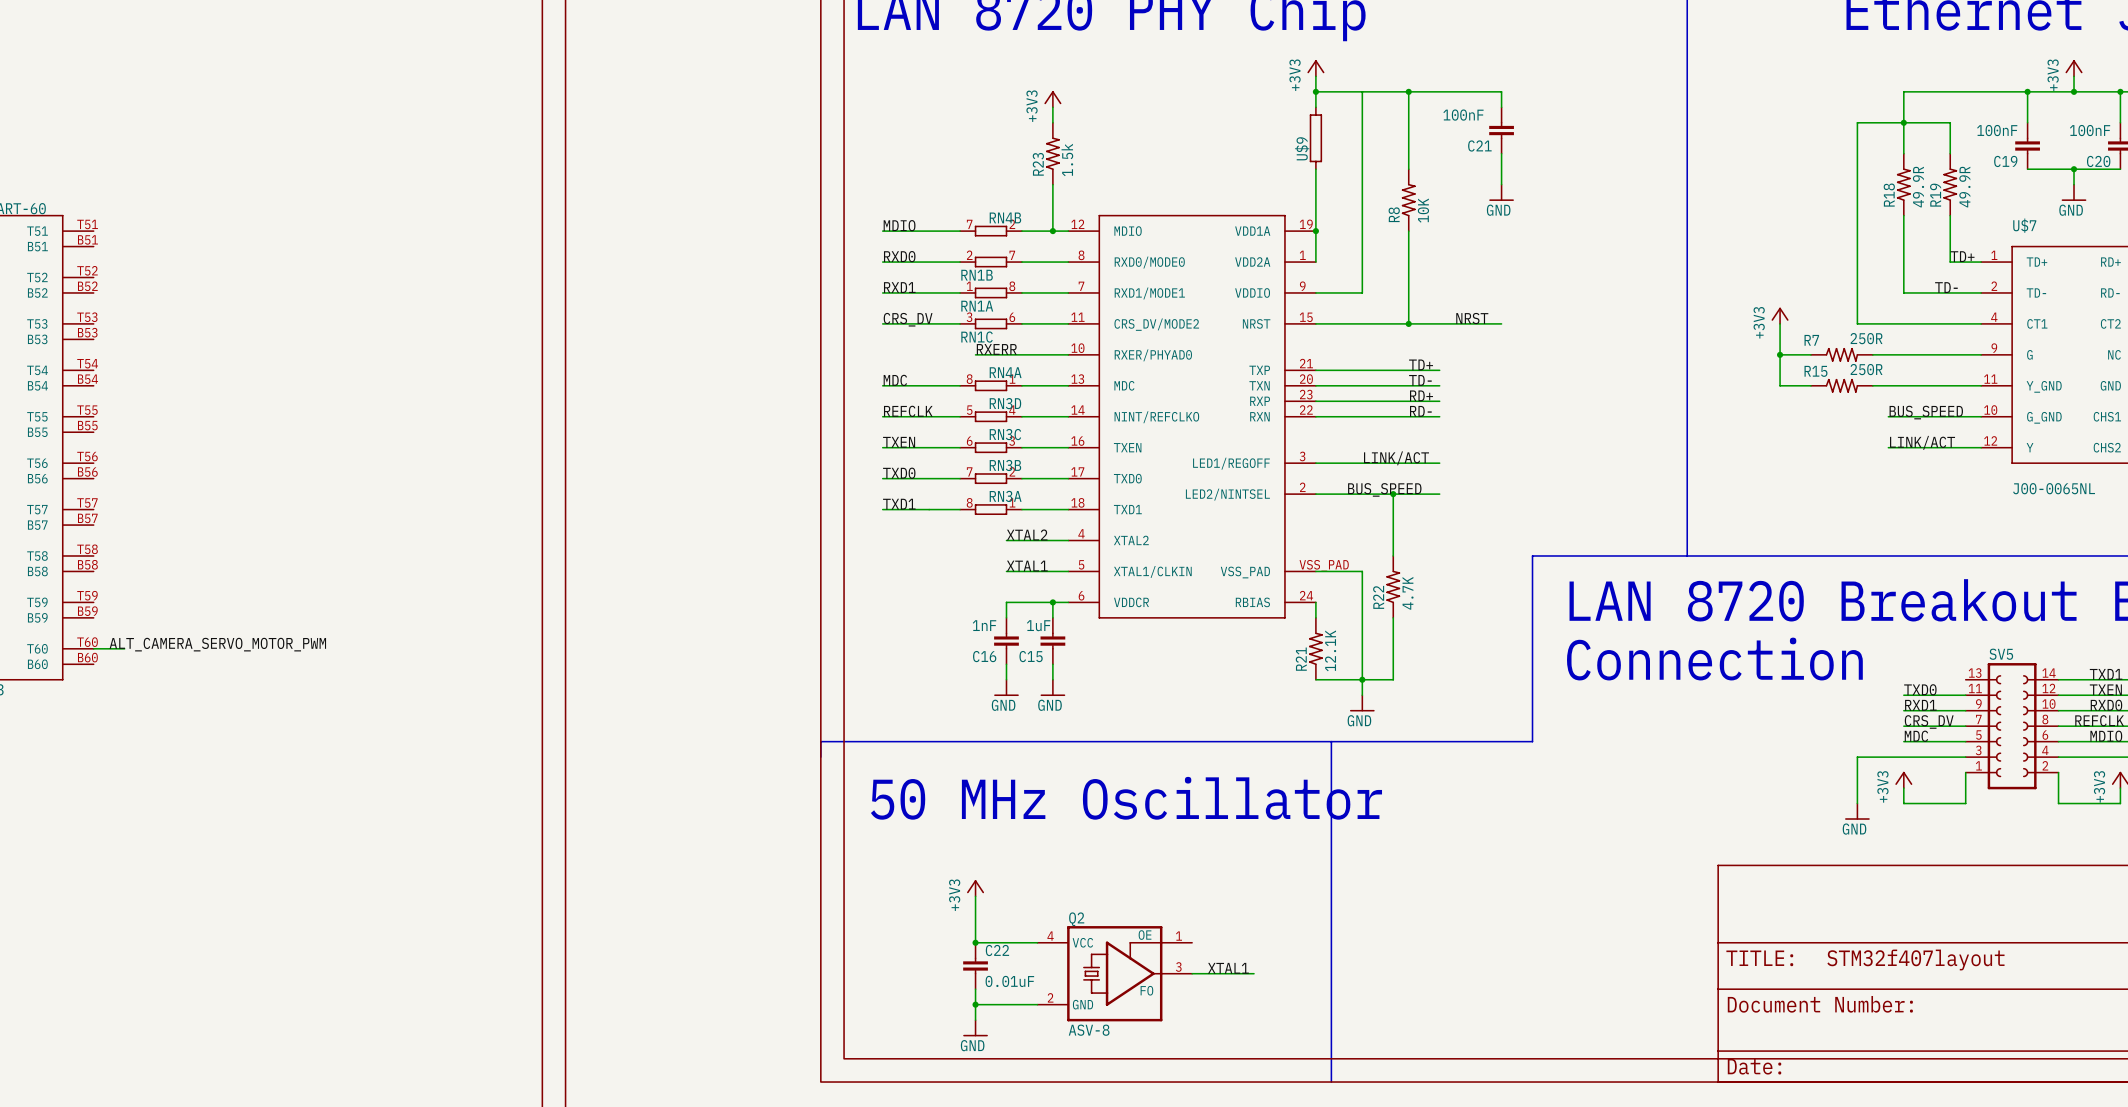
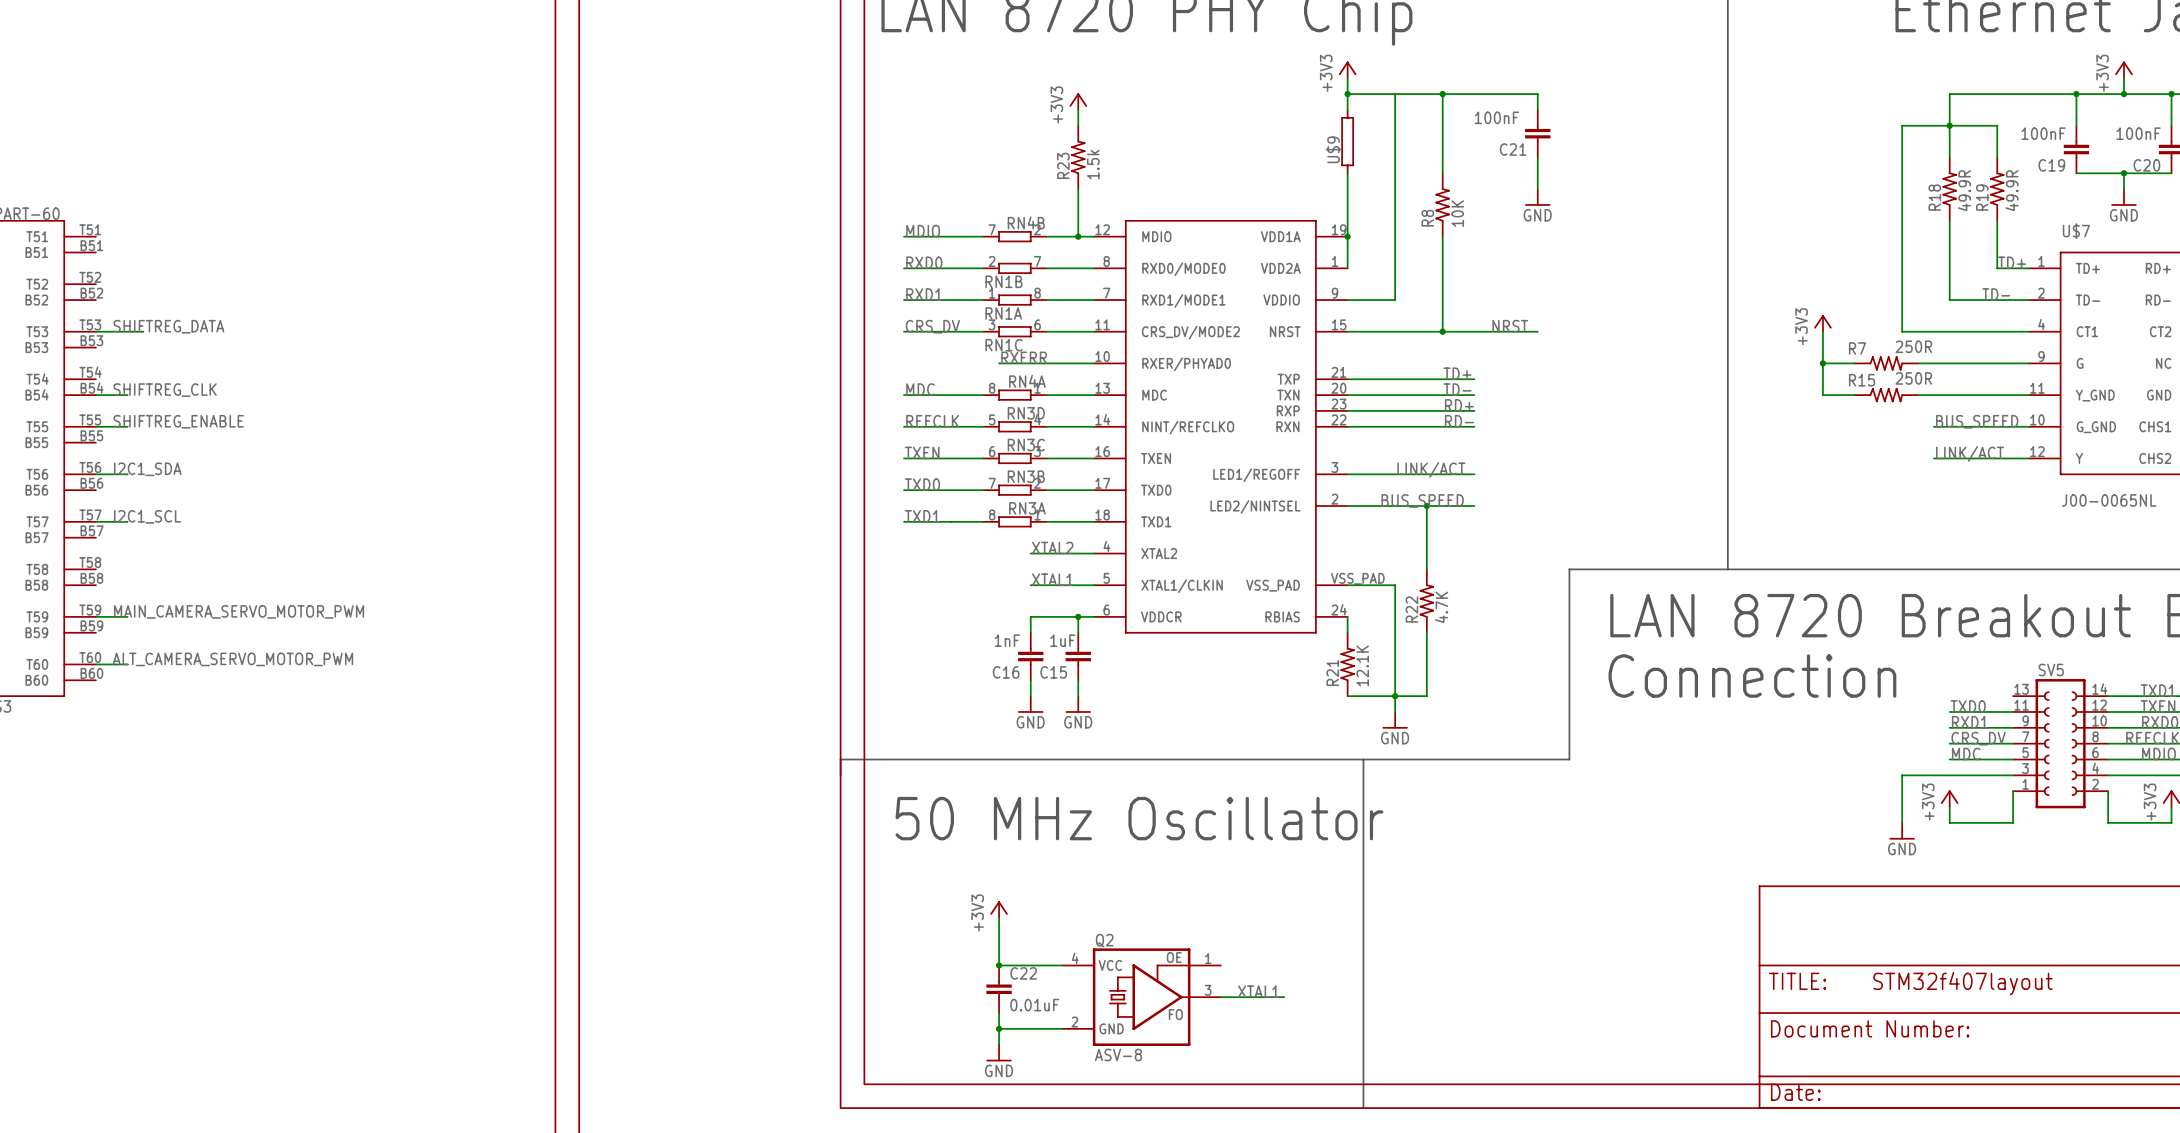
label: none -> SHIFTREG_DATA (168, 326)
wire: none -> (95, 331) (143, 331)
label: none -> SHIFTREG_CLK (165, 390)
wire: none -> (95, 395) (127, 395)
label: none -> SHIFTREG_ENABLE (178, 421)
wire: none -> (95, 426) (127, 426)
label: none -> I2C1_SDA (147, 469)
wire: none -> (95, 474) (127, 474)
label: none -> I2C1_SCL (147, 516)
wire: none -> (95, 521) (127, 521)
label: none -> MAIN_CAMERA_SERVO_MOTOR_PWM (239, 611)
wire: none -> (95, 616) (127, 616)

